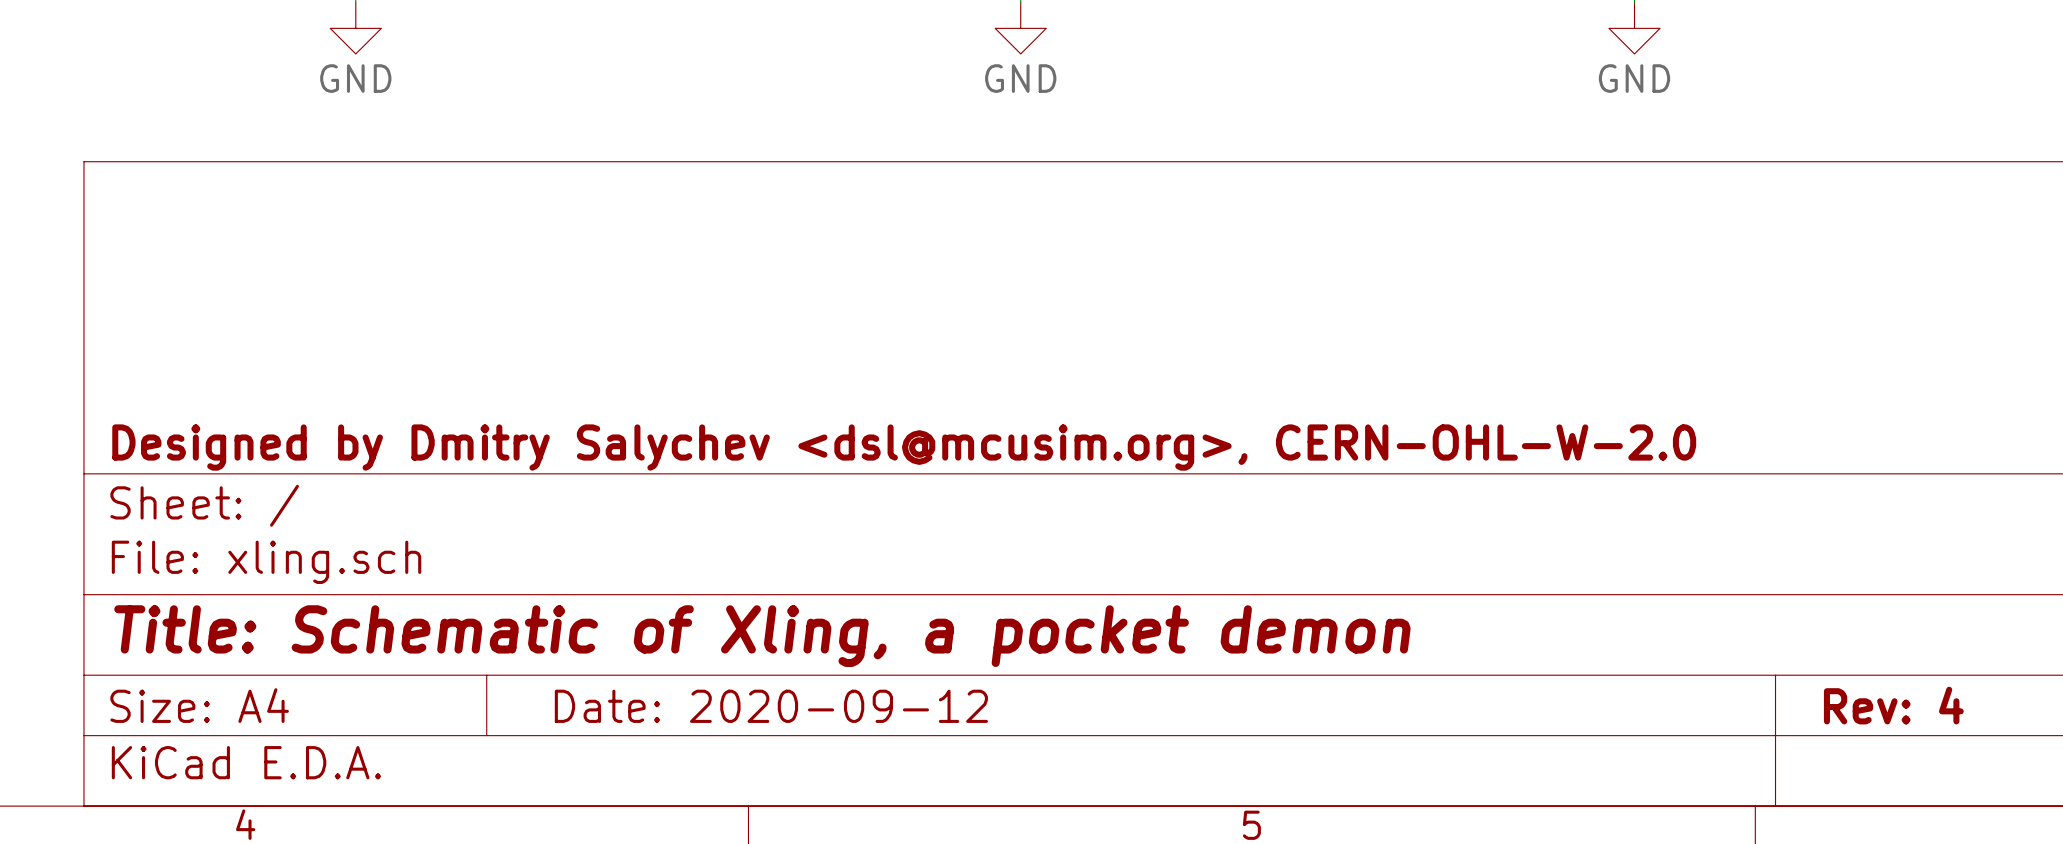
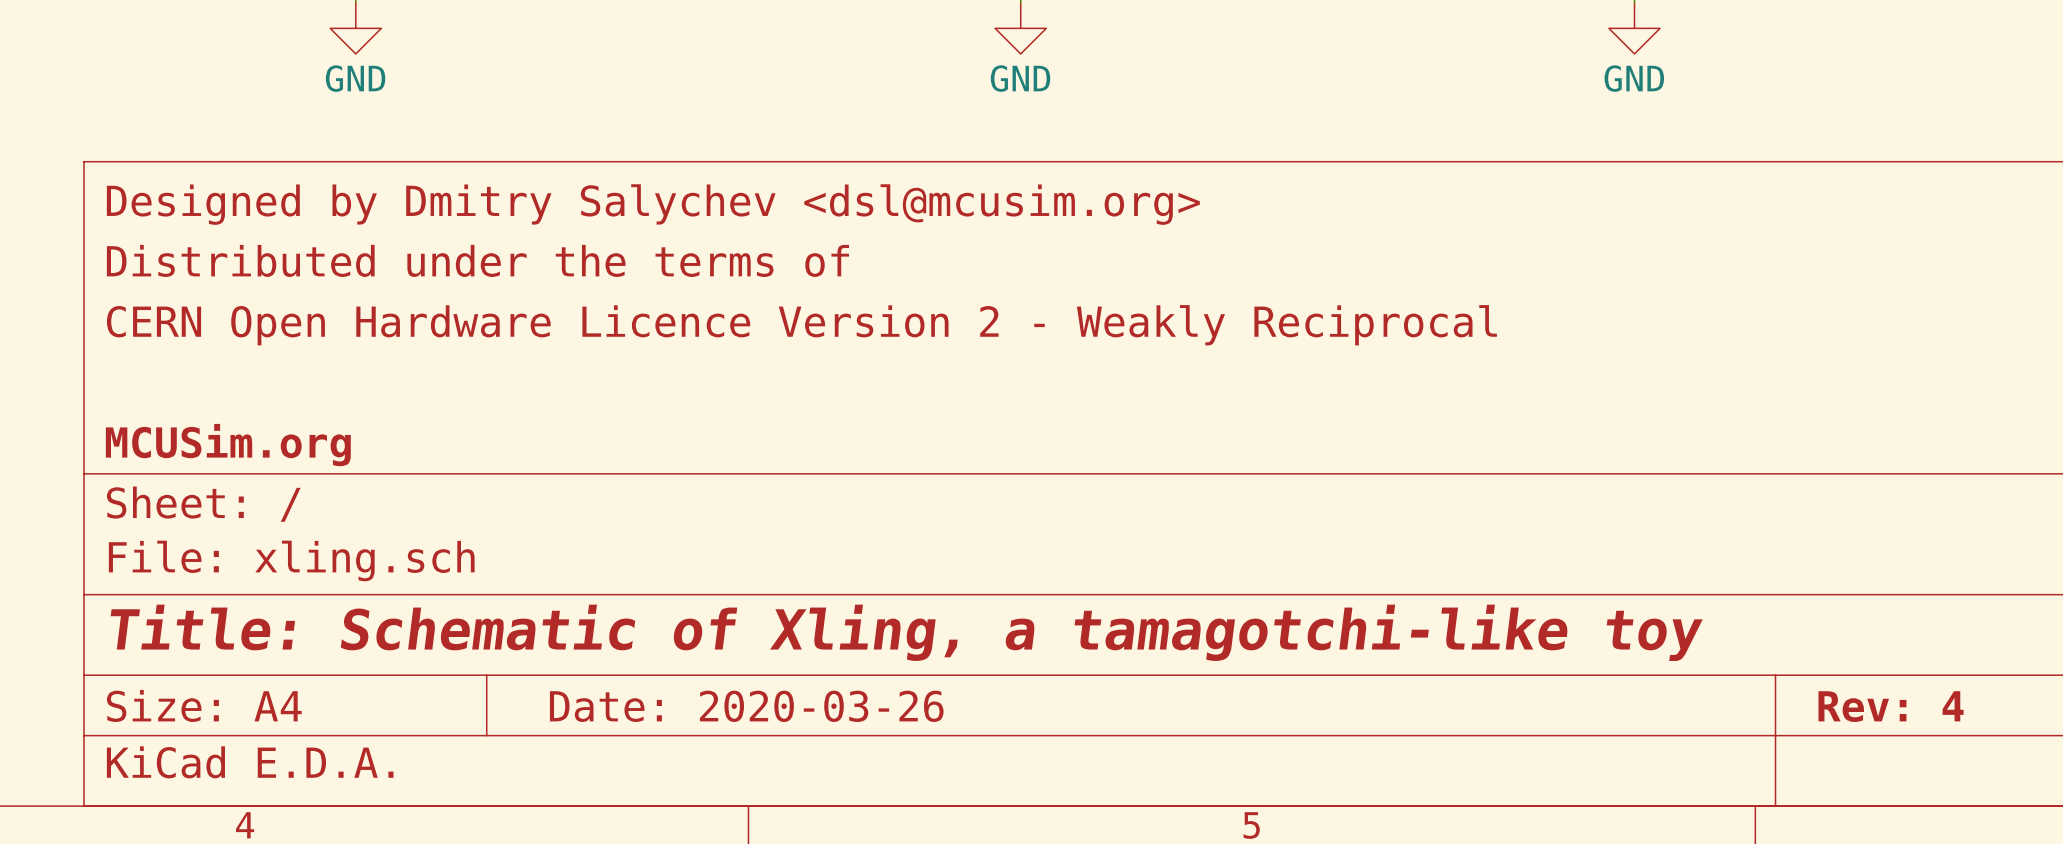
title block: none -> Designed by Dmitry Salychev <dsl@mcusim.org> (653, 204)
title block: none -> Distributed under the terms of (477, 260)
title block: none -> CERN Open Hardware Licence Version 2 - Weakly Reciprocal (801, 325)
title block: Designed by Dmitry Salychev <dsl@mcusim.org>, CERN-OHL-W-2.0 (904, 447) -> MCUSim.org (228, 445)
title block: Title: Schematic of Xling, a pocket demon (762, 636) -> Title: Schematic of Xling, a tamagotchi-like toy (906, 632)
title block: Date: 2020-09-12 (771, 706) -> Date: 2020-03-26 (746, 706)

